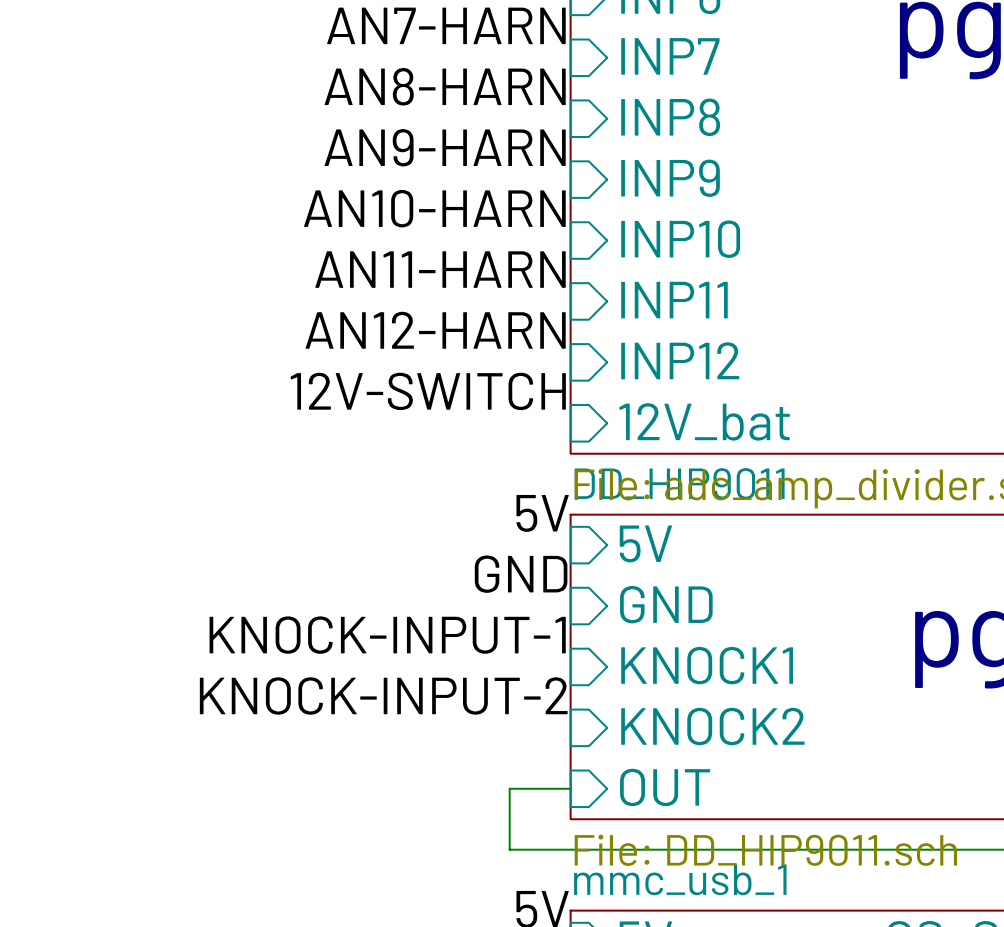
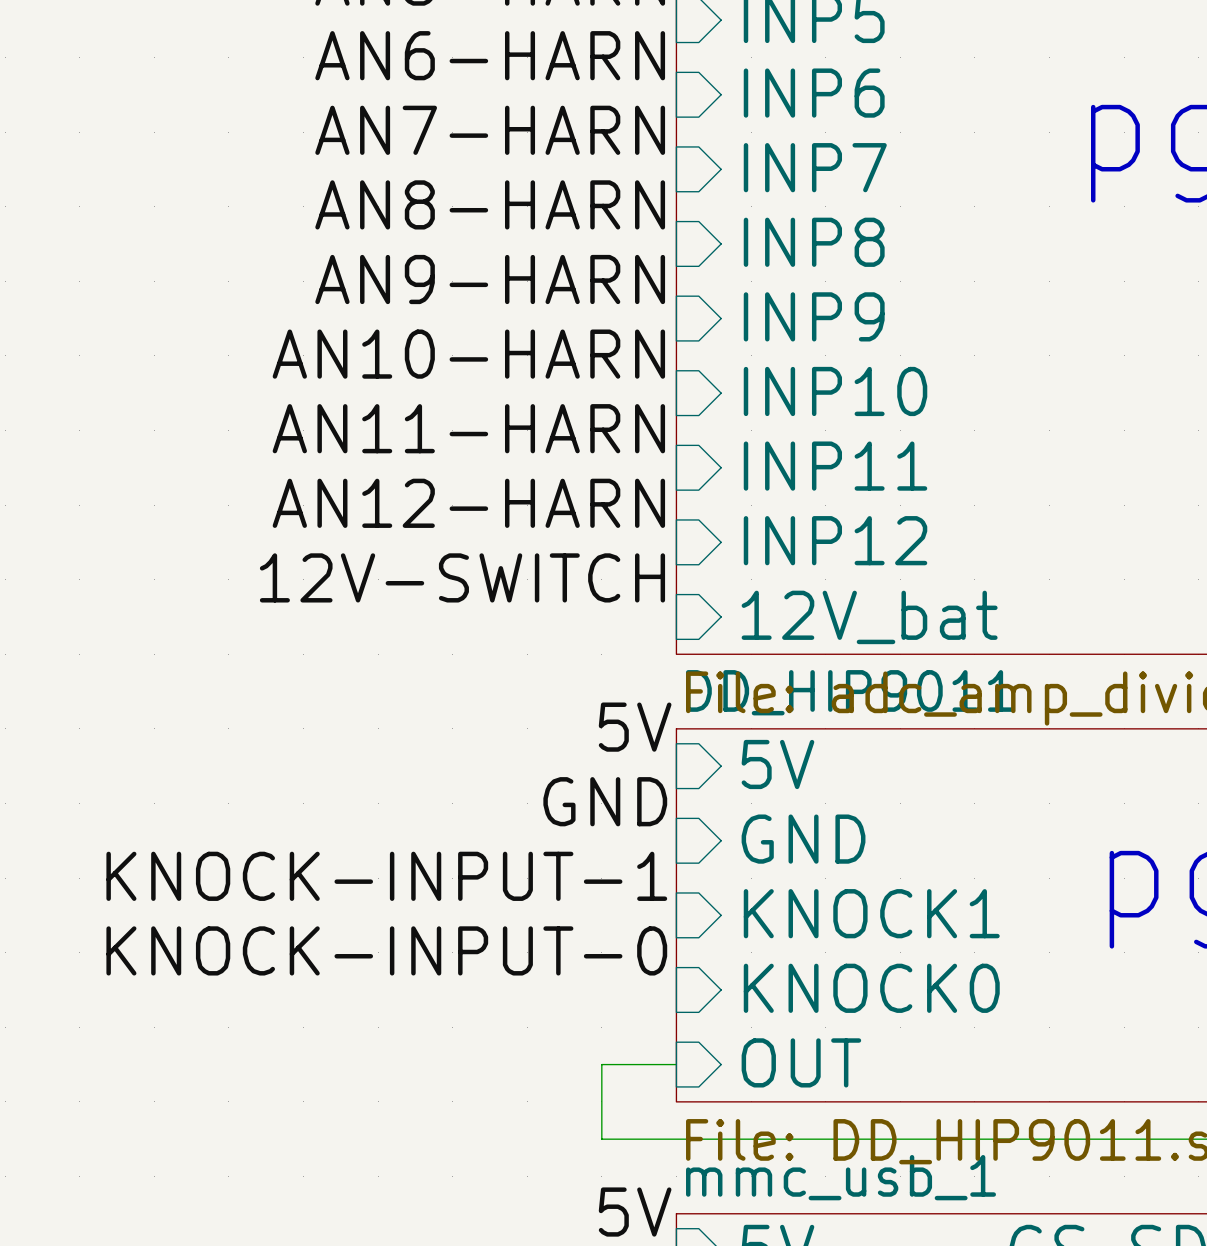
label: KNOCK-INPUT-2 (383, 696) -> KNOCK-INPUT-0 (386, 950)
sheet pin: KNOCK2 (712, 726) -> KNOCK0 (871, 988)

